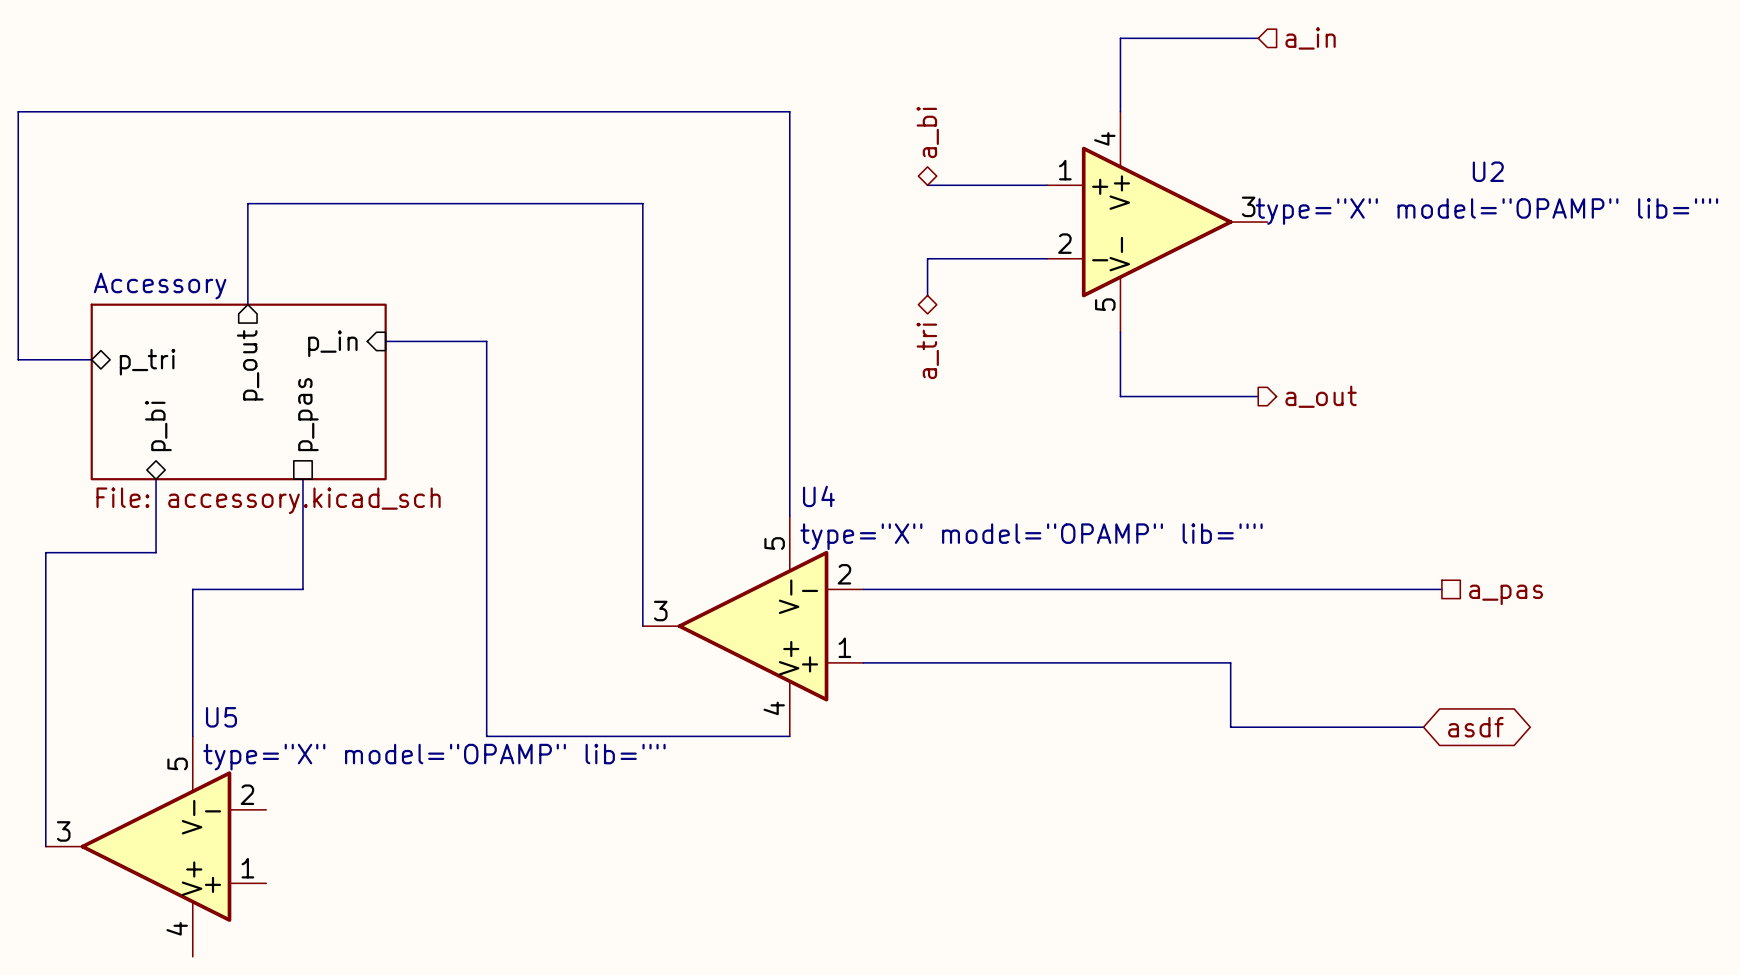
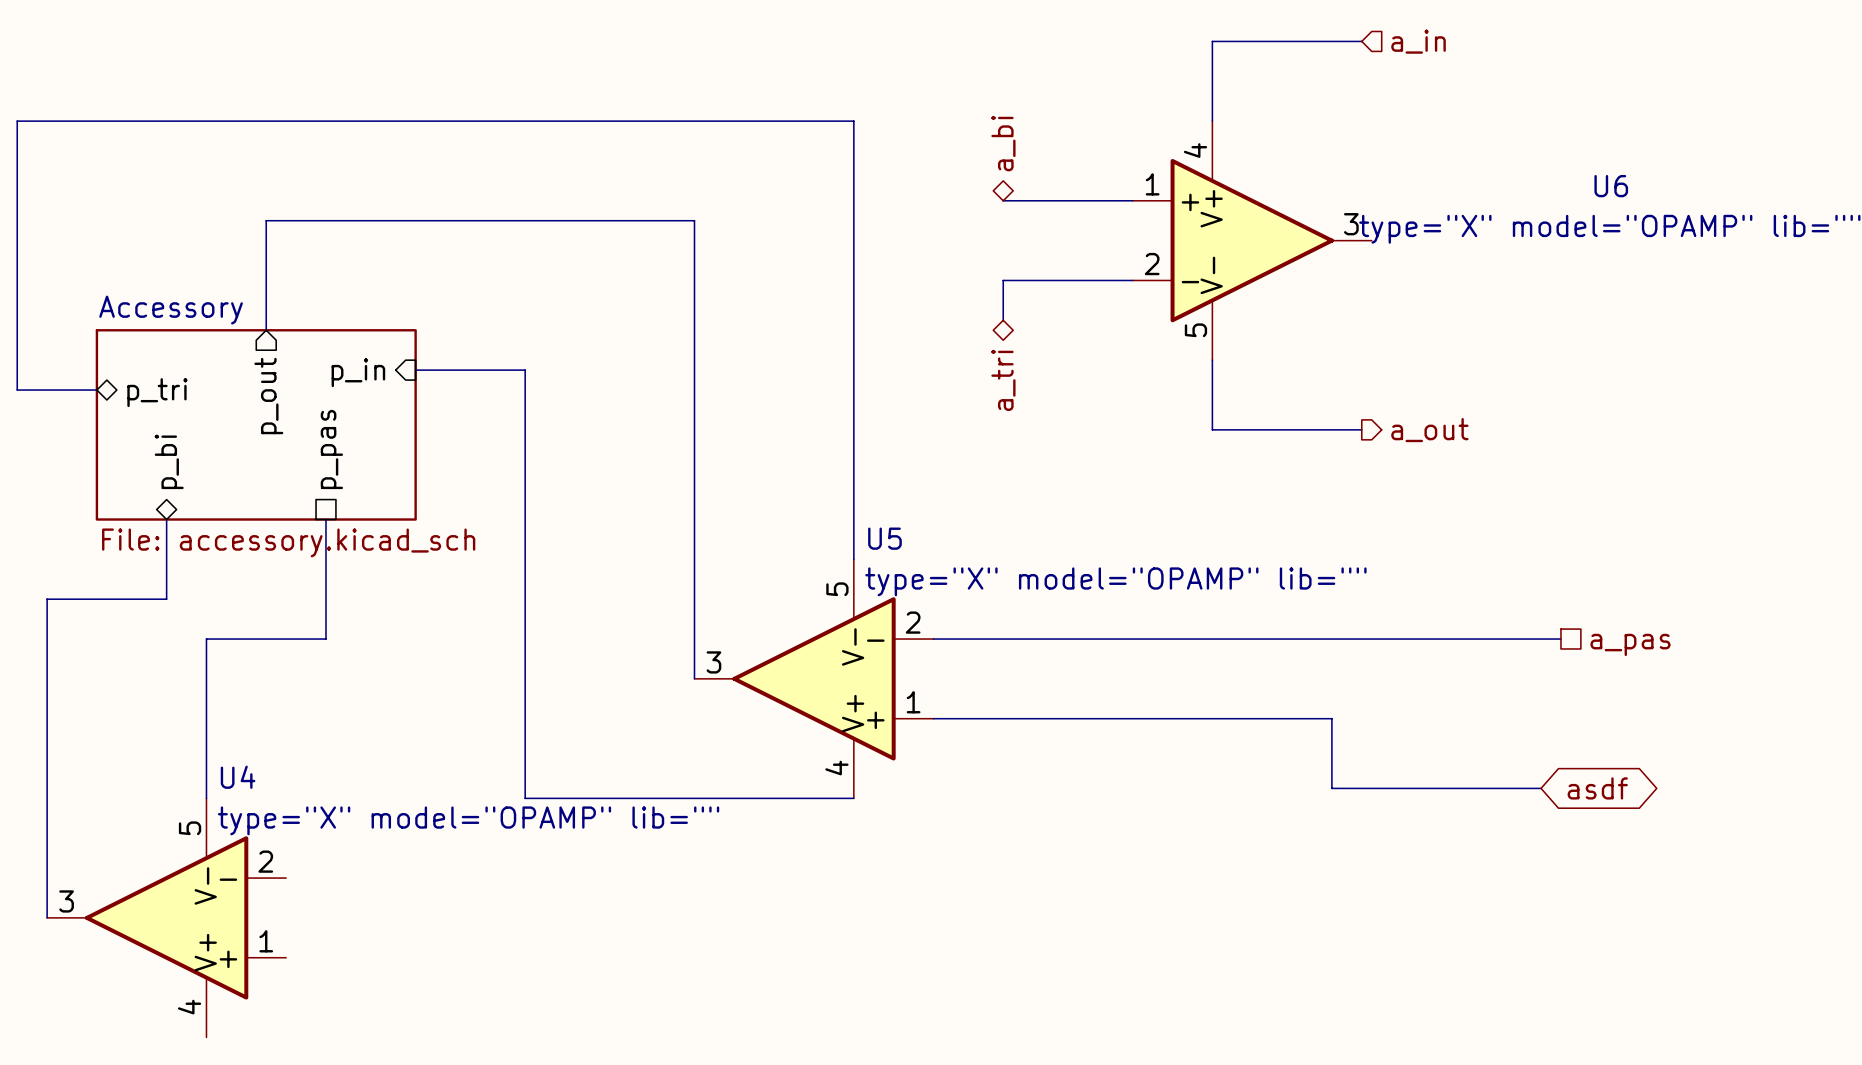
U2 name: U2 (1488, 171) -> U6 (1611, 186)
U4 name: U4 (818, 496) -> U5 (884, 538)
U5 name: U5 (221, 717) -> U4 (238, 777)

